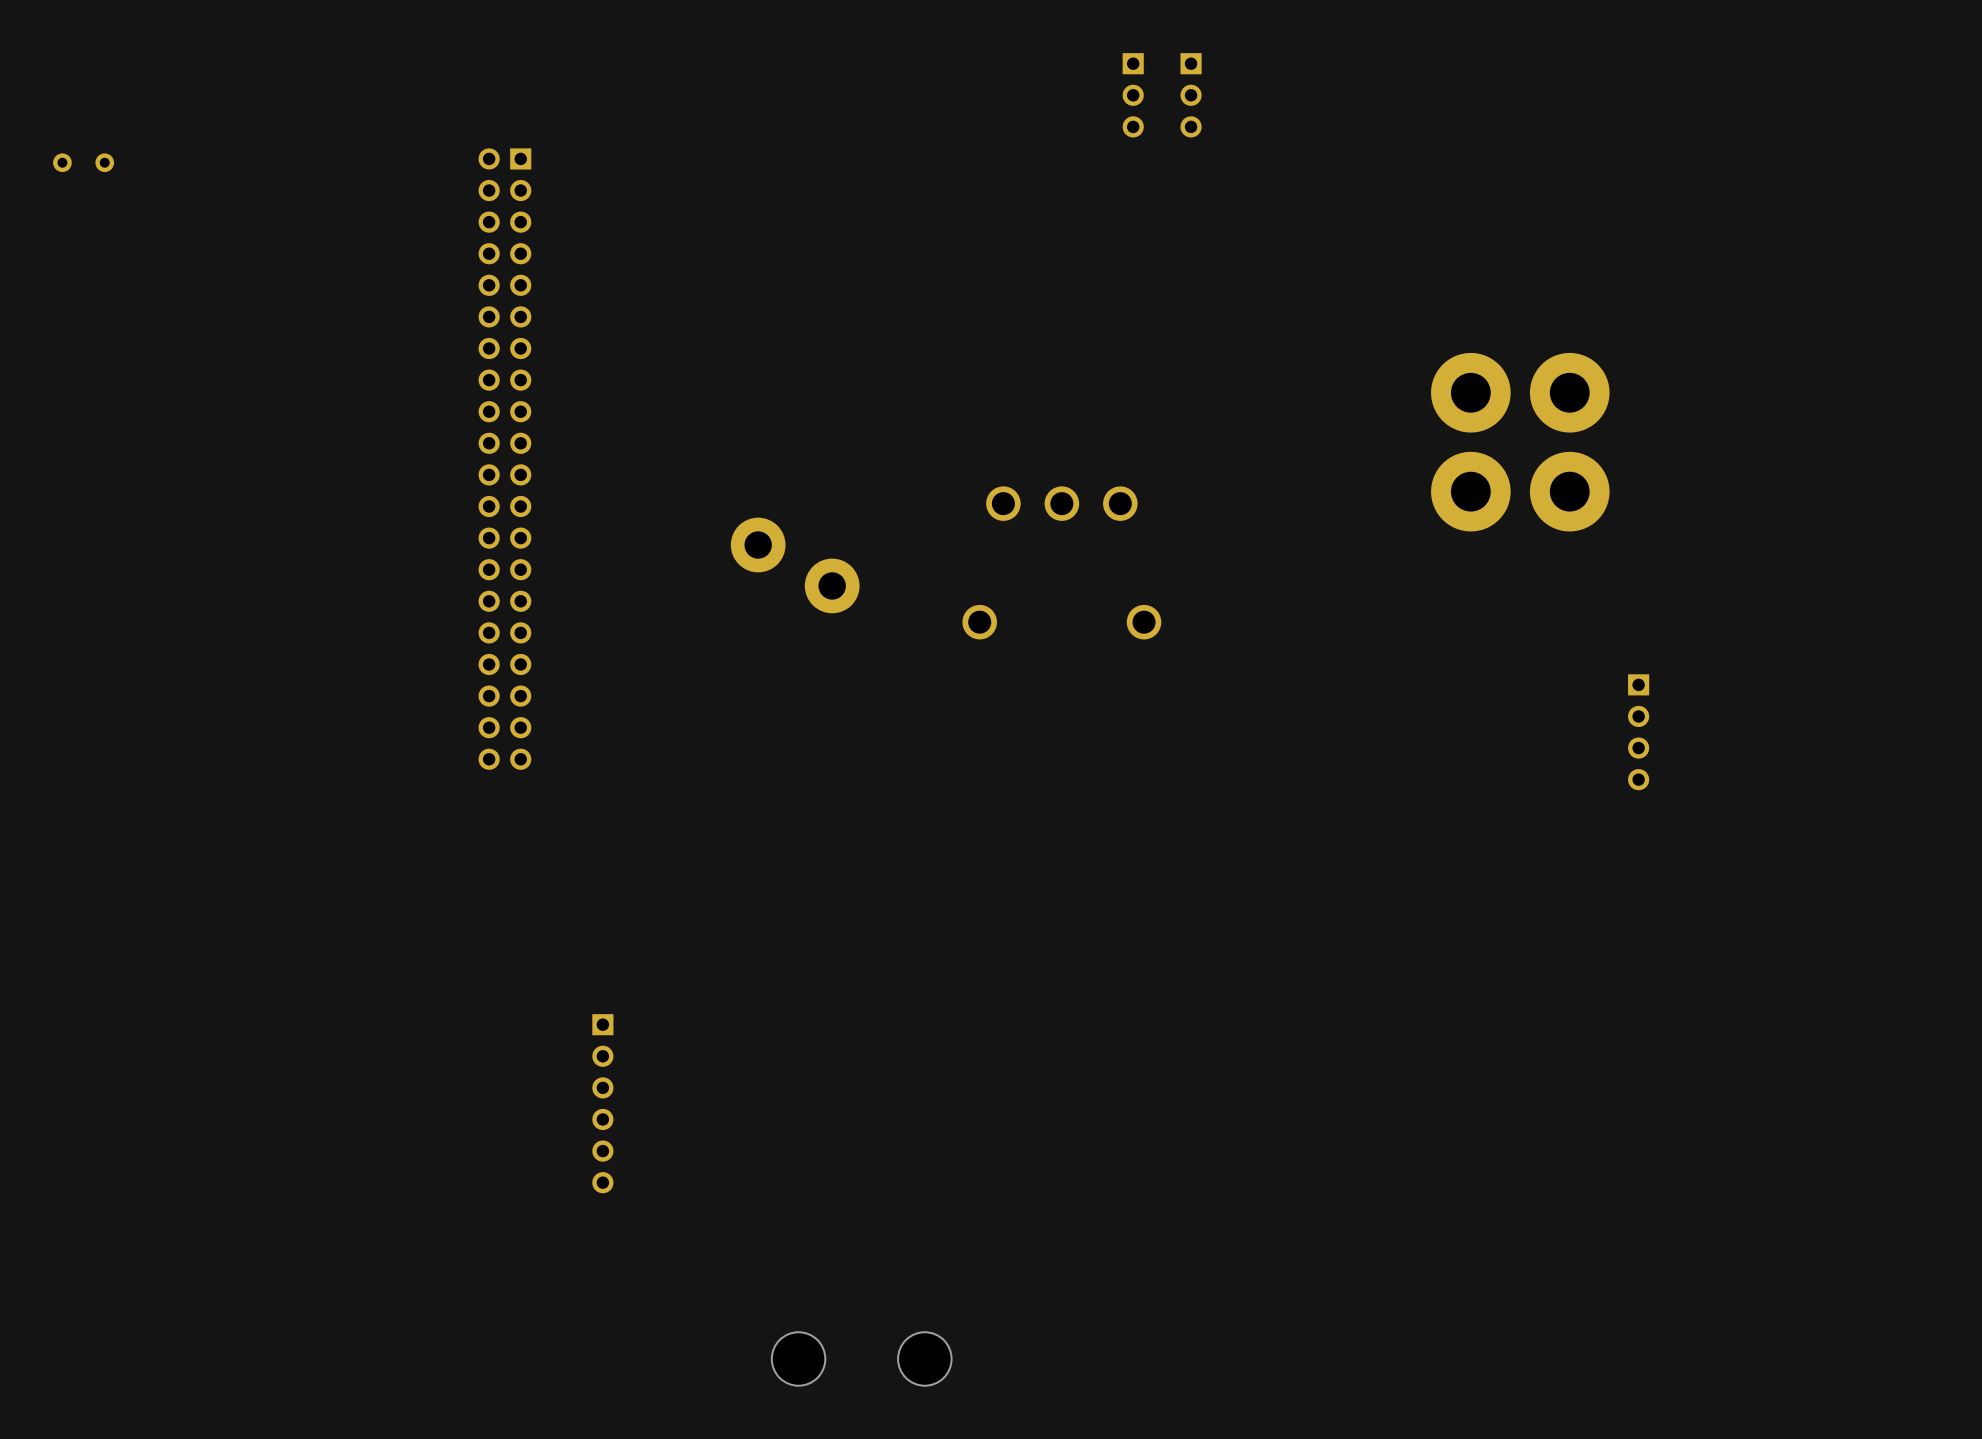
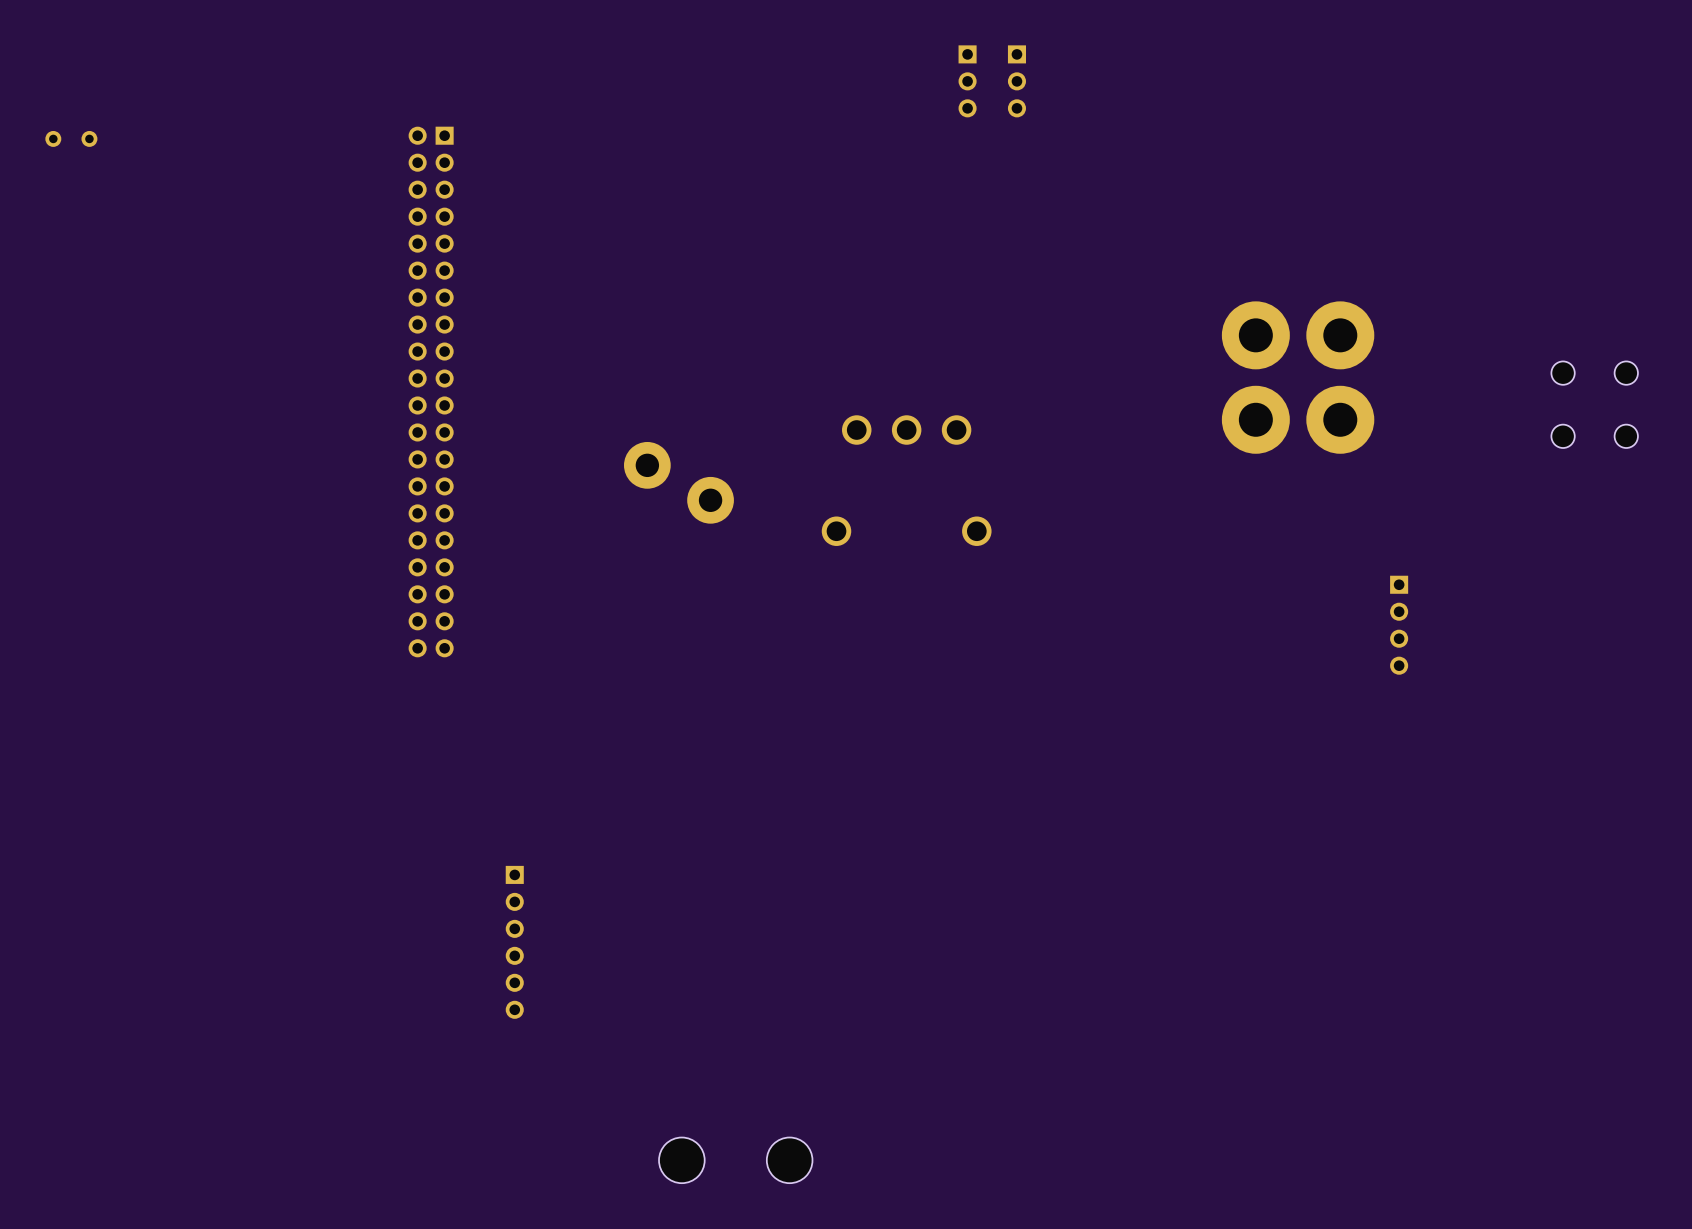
part: none -> (1563, 373)
part: none -> (1626, 373)
part: none -> (1563, 436)
part: none -> (1626, 436)

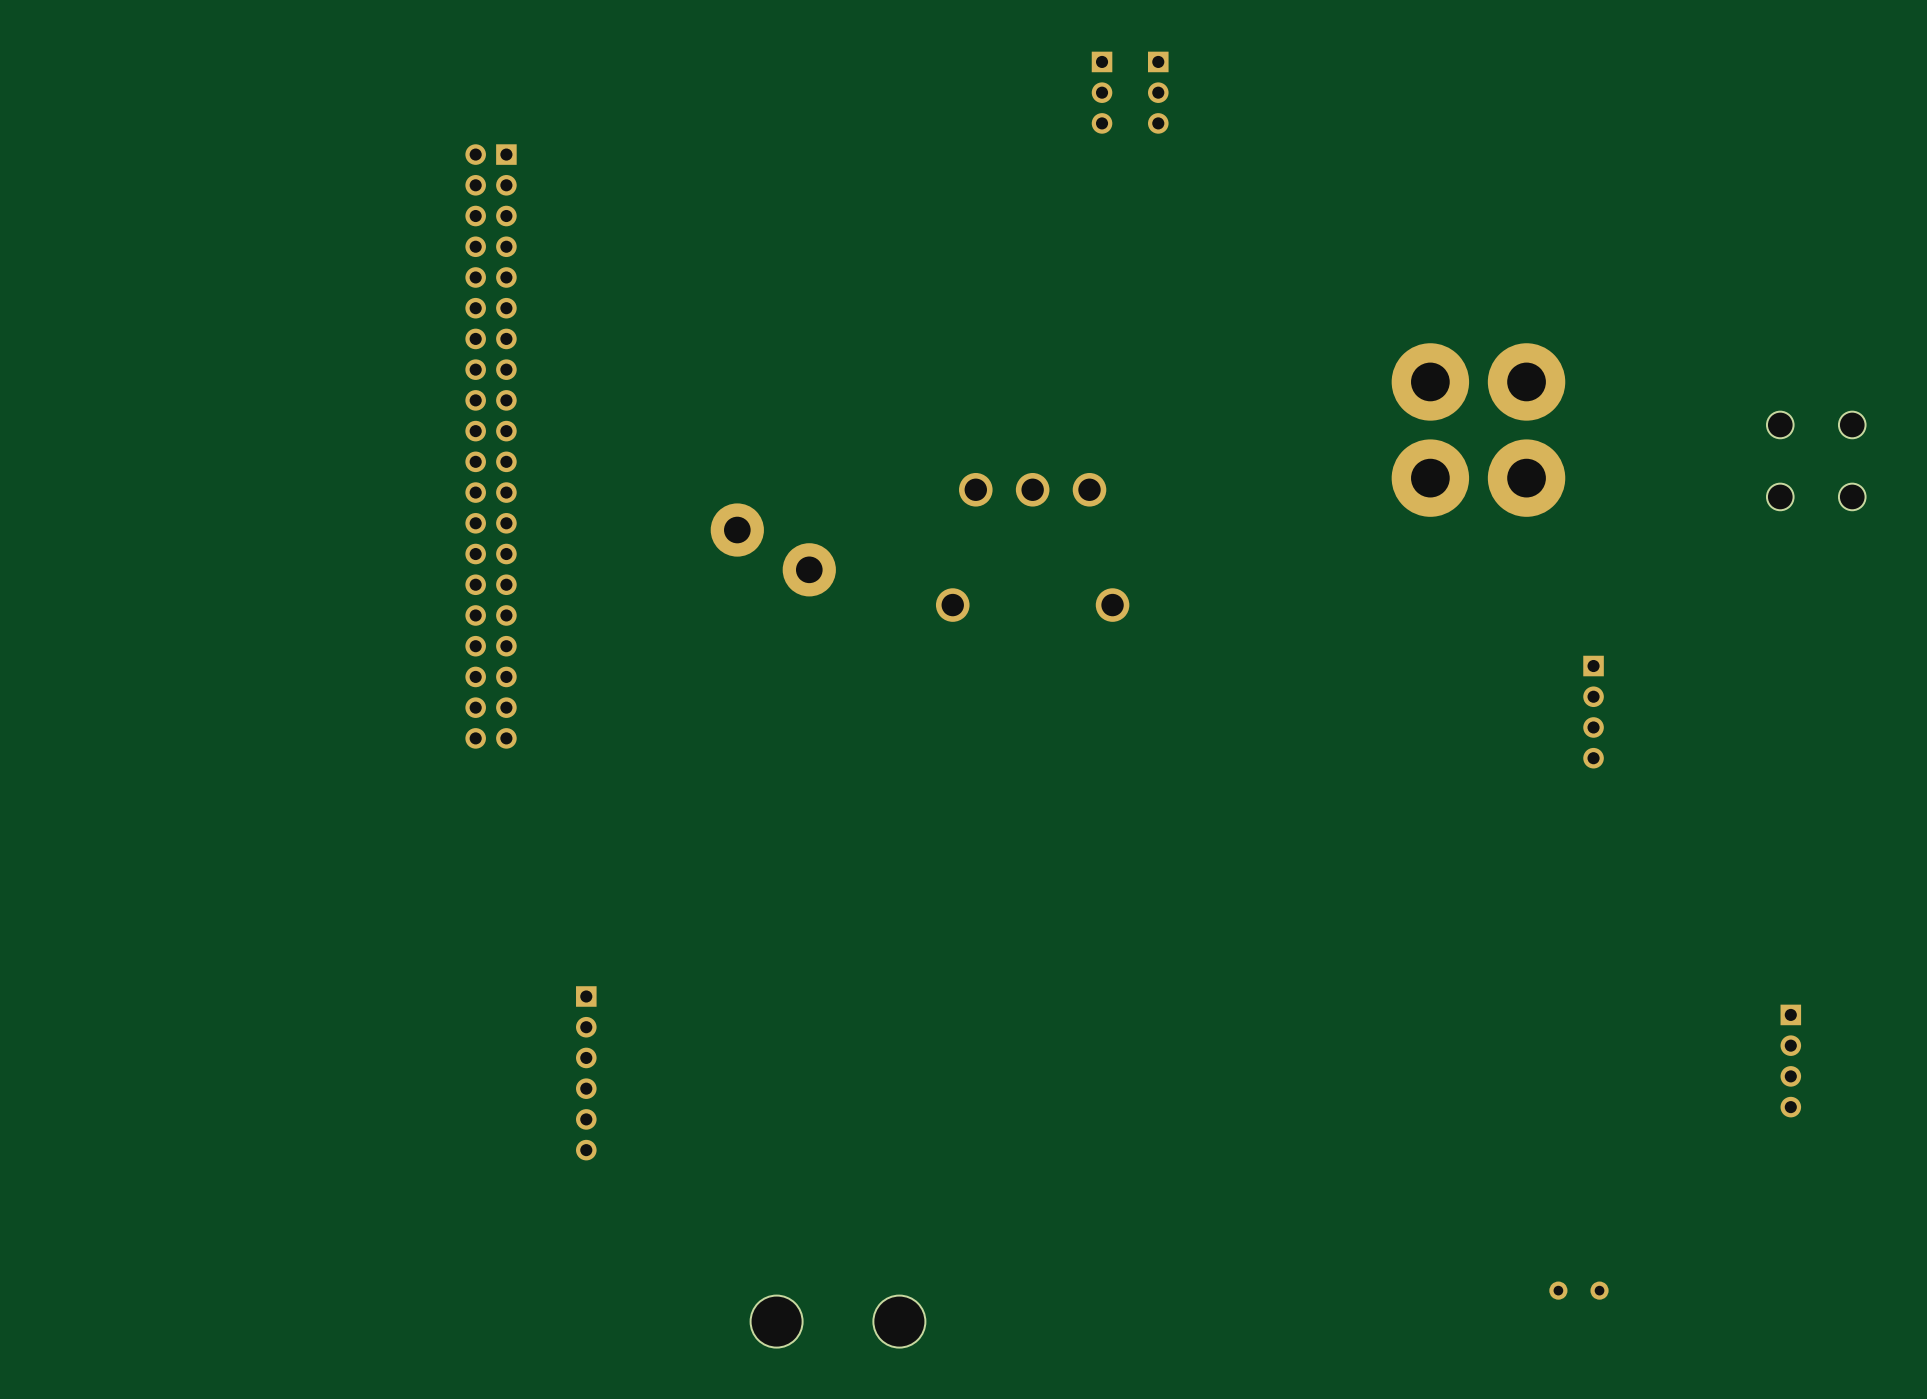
part: (71, 138) -> none
part: none -> (1790, 1061)
part: none -> (1578, 1290)

